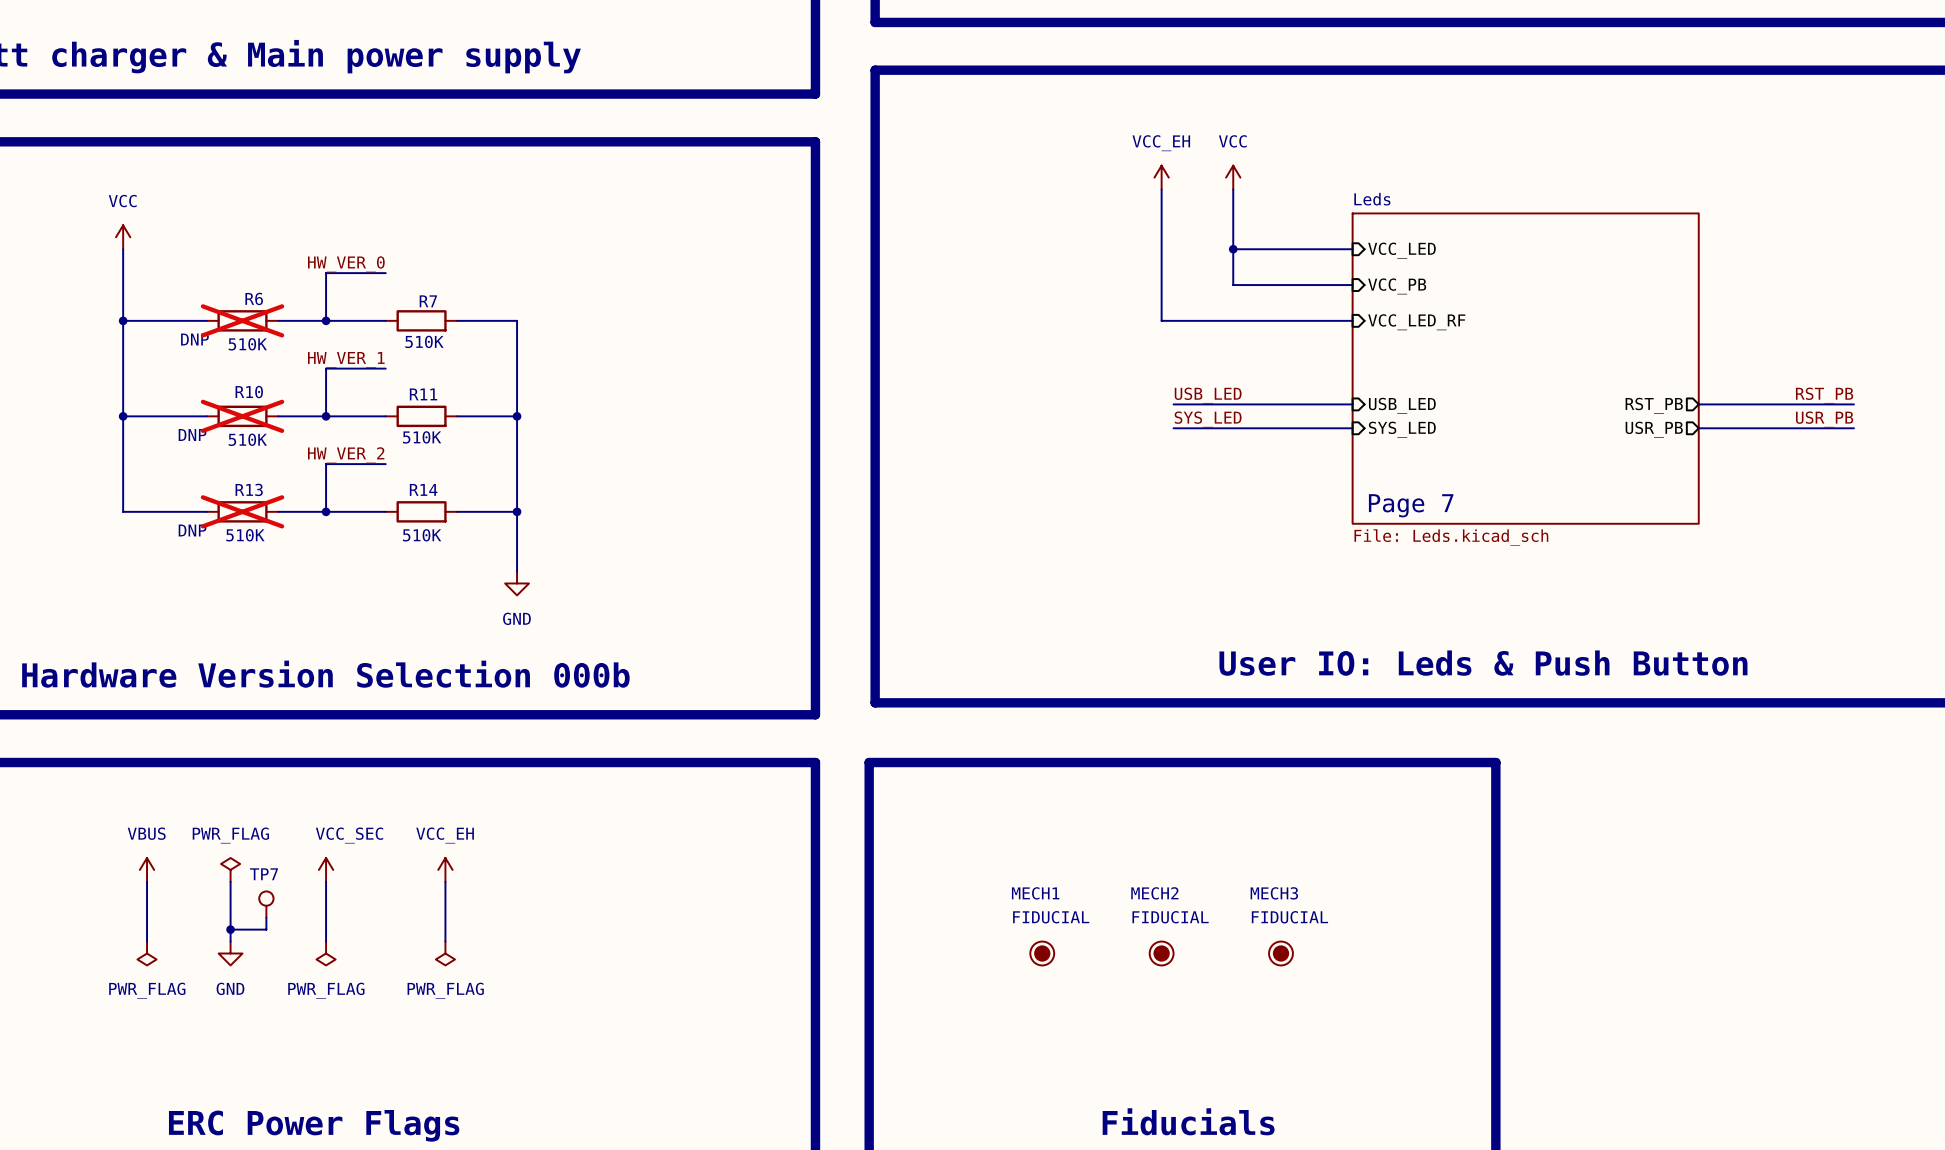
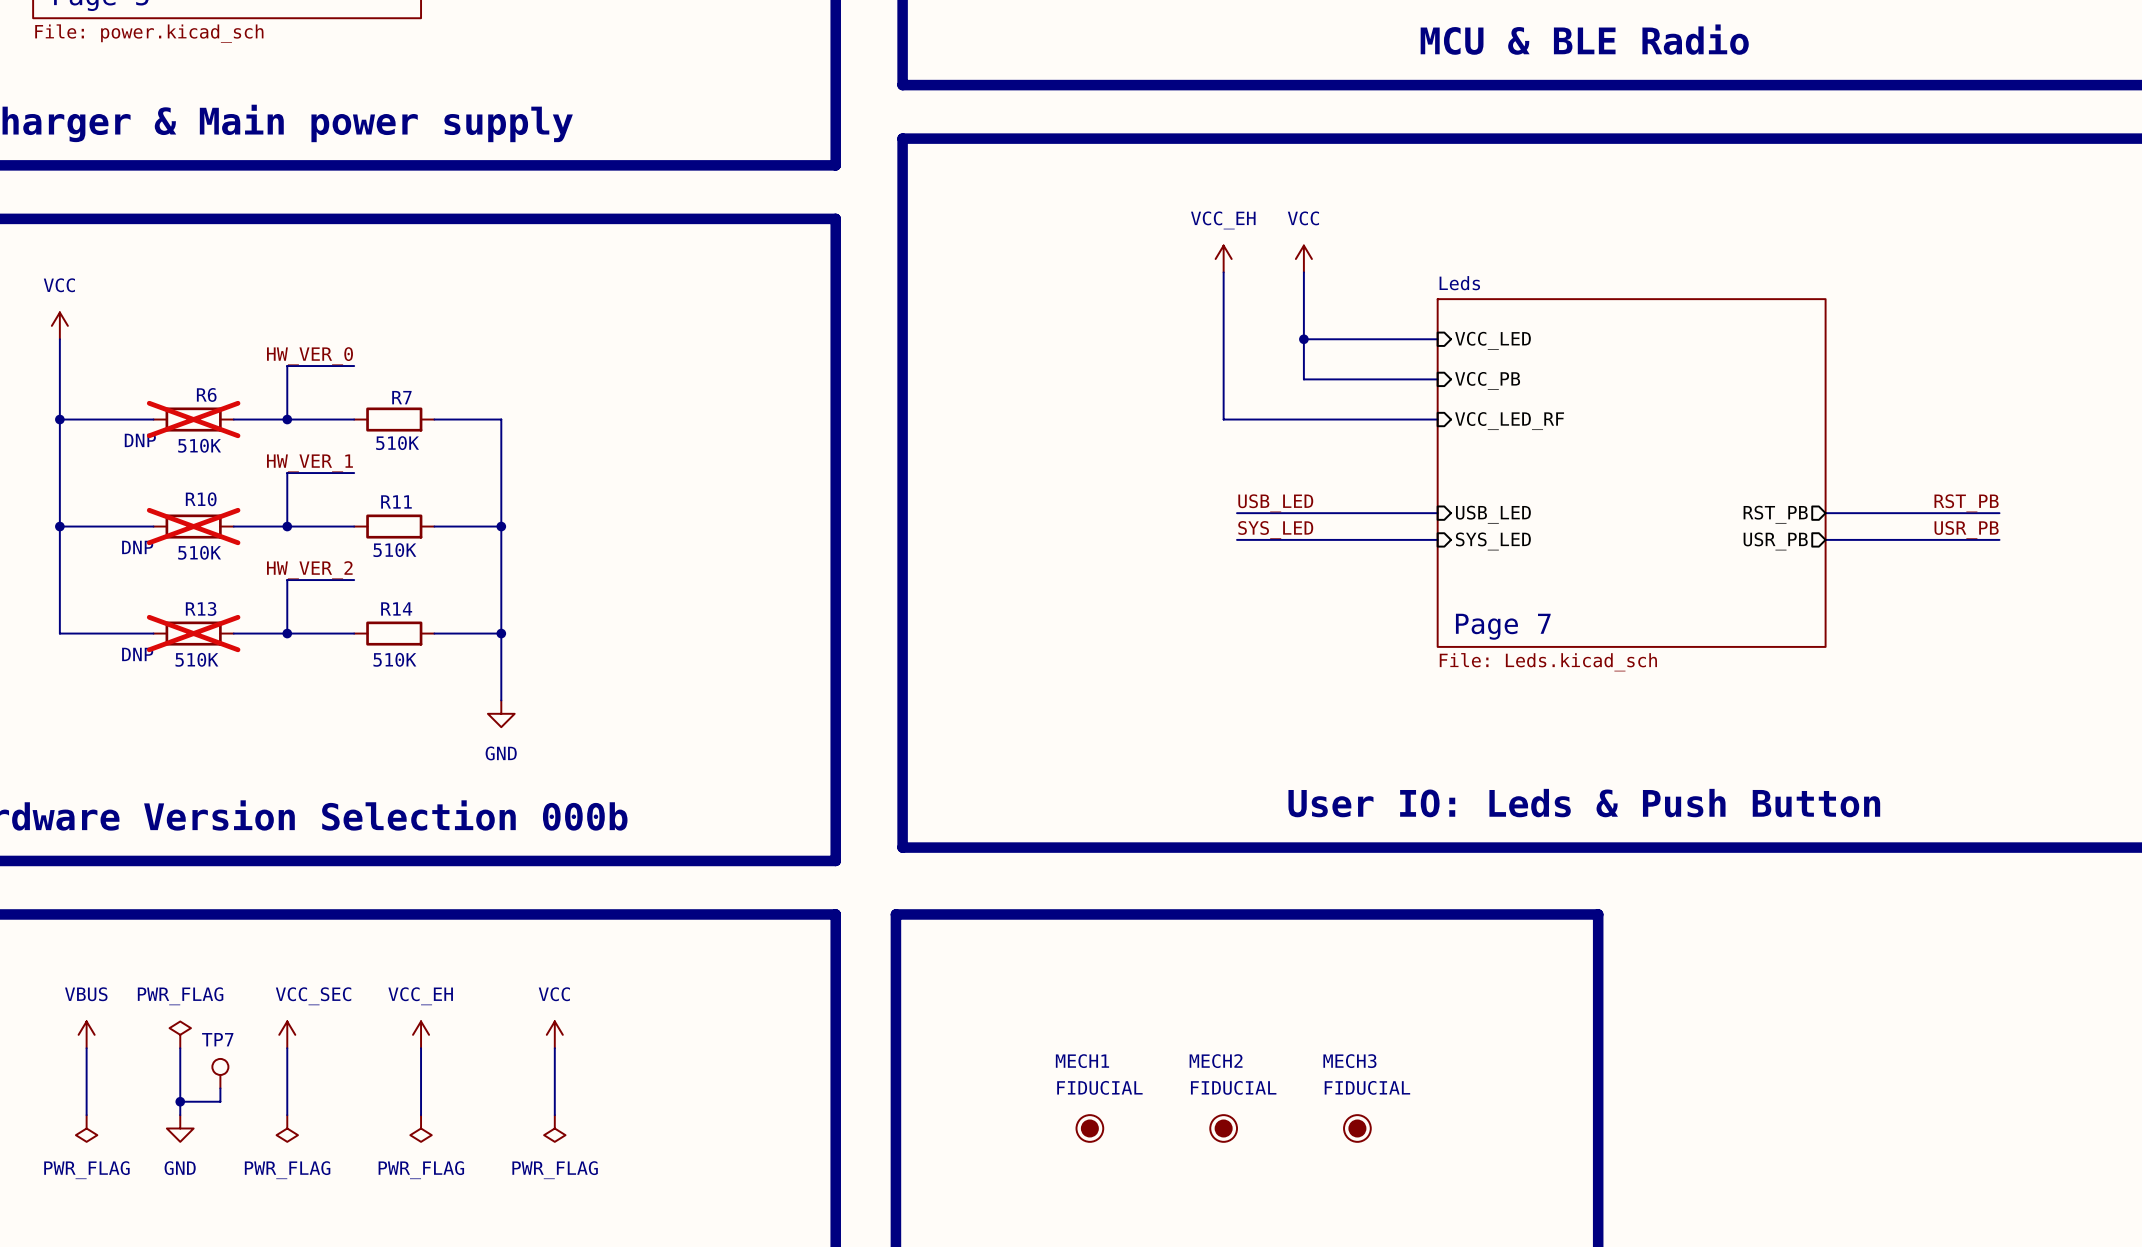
power symbol: none -> VCC (554, 1034)
wire: none -> (554, 1048) (554, 1115)
power symbol: none -> PWR_FLAG (554, 1128)

